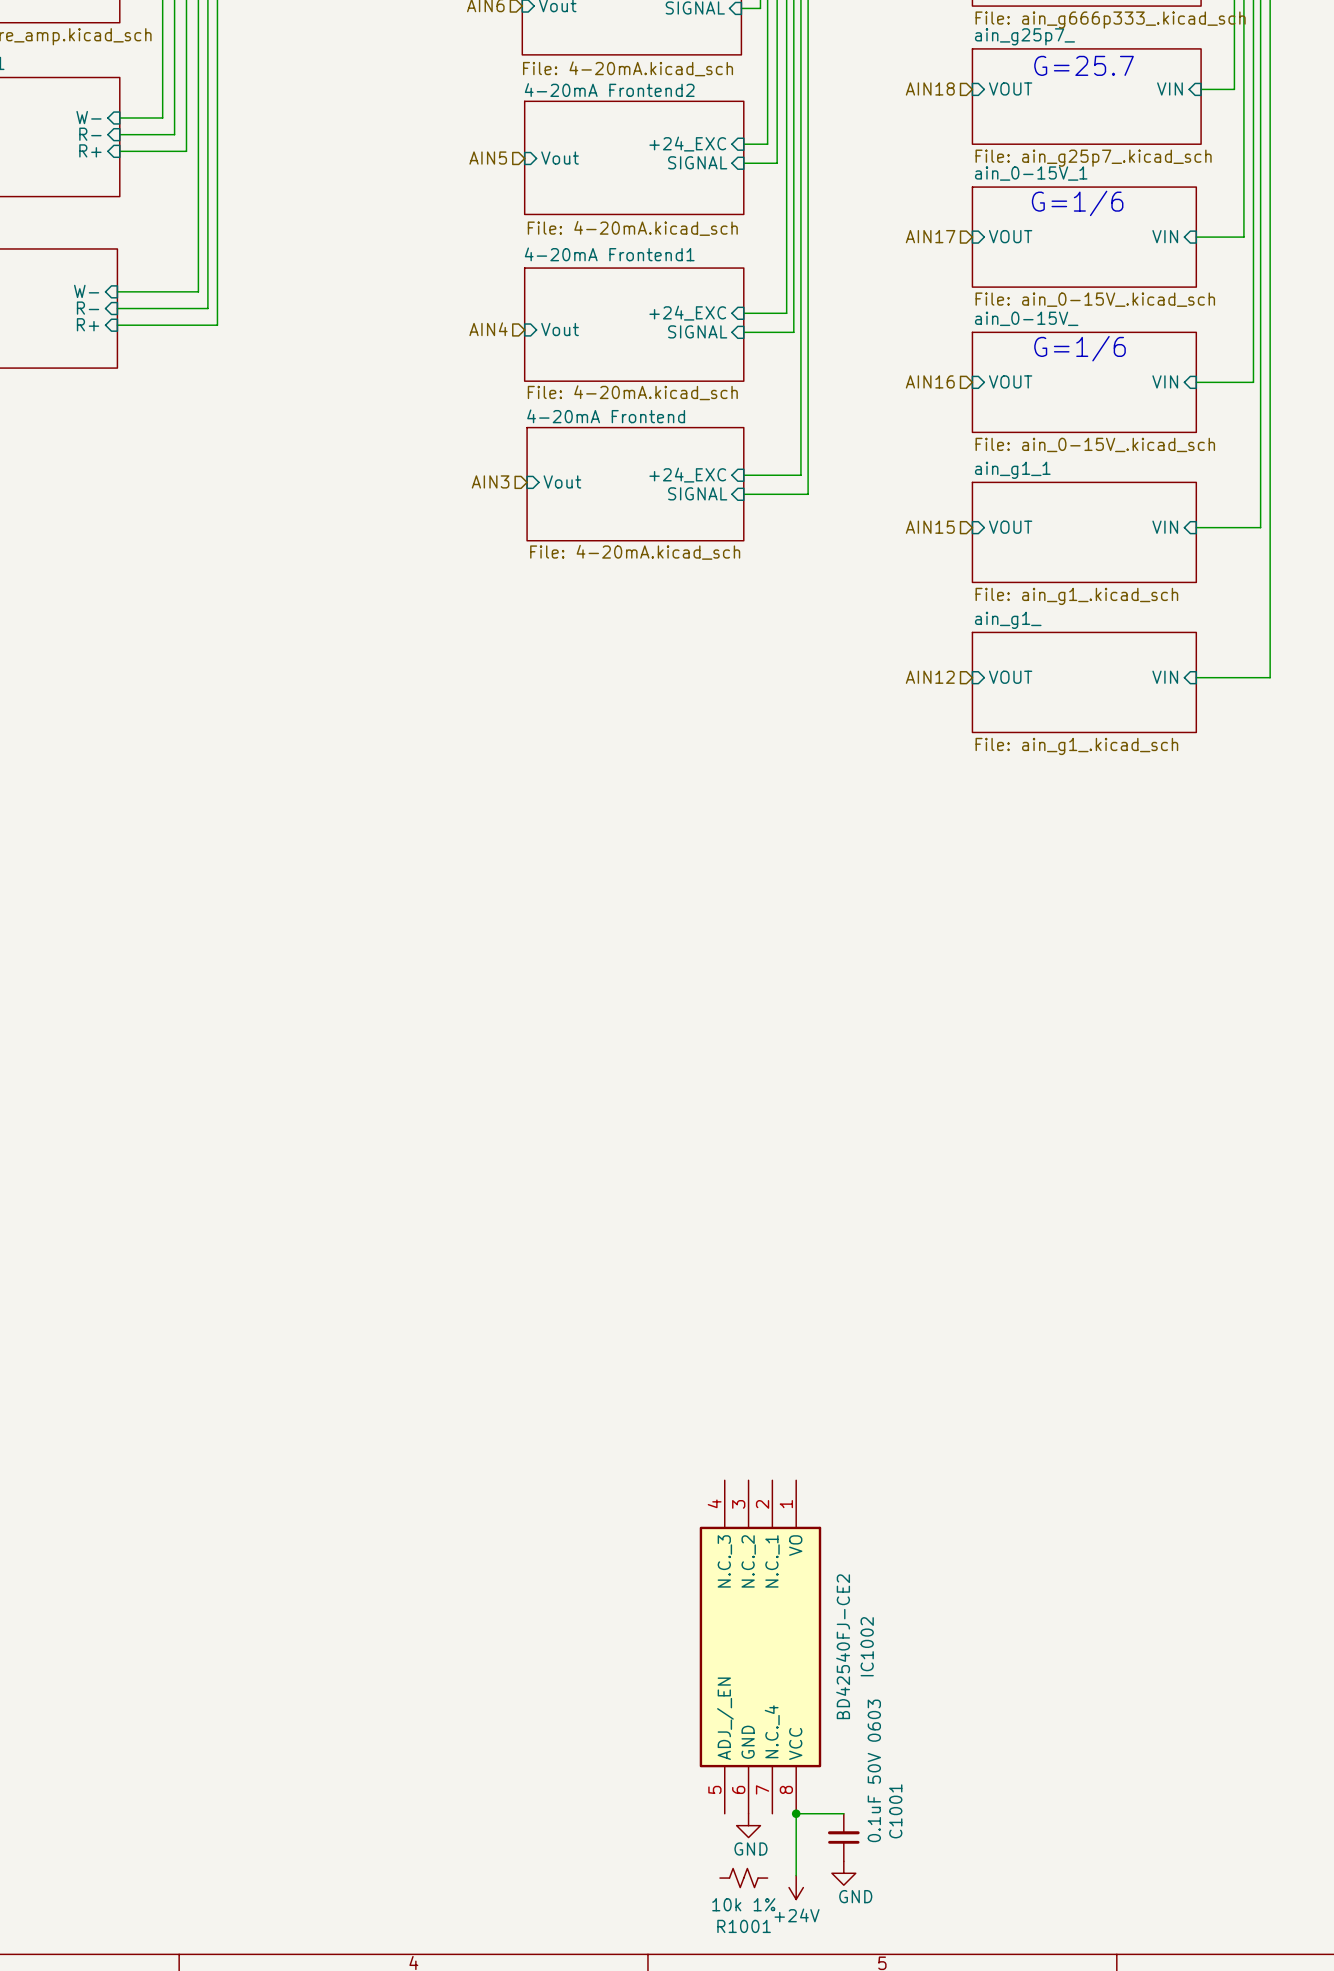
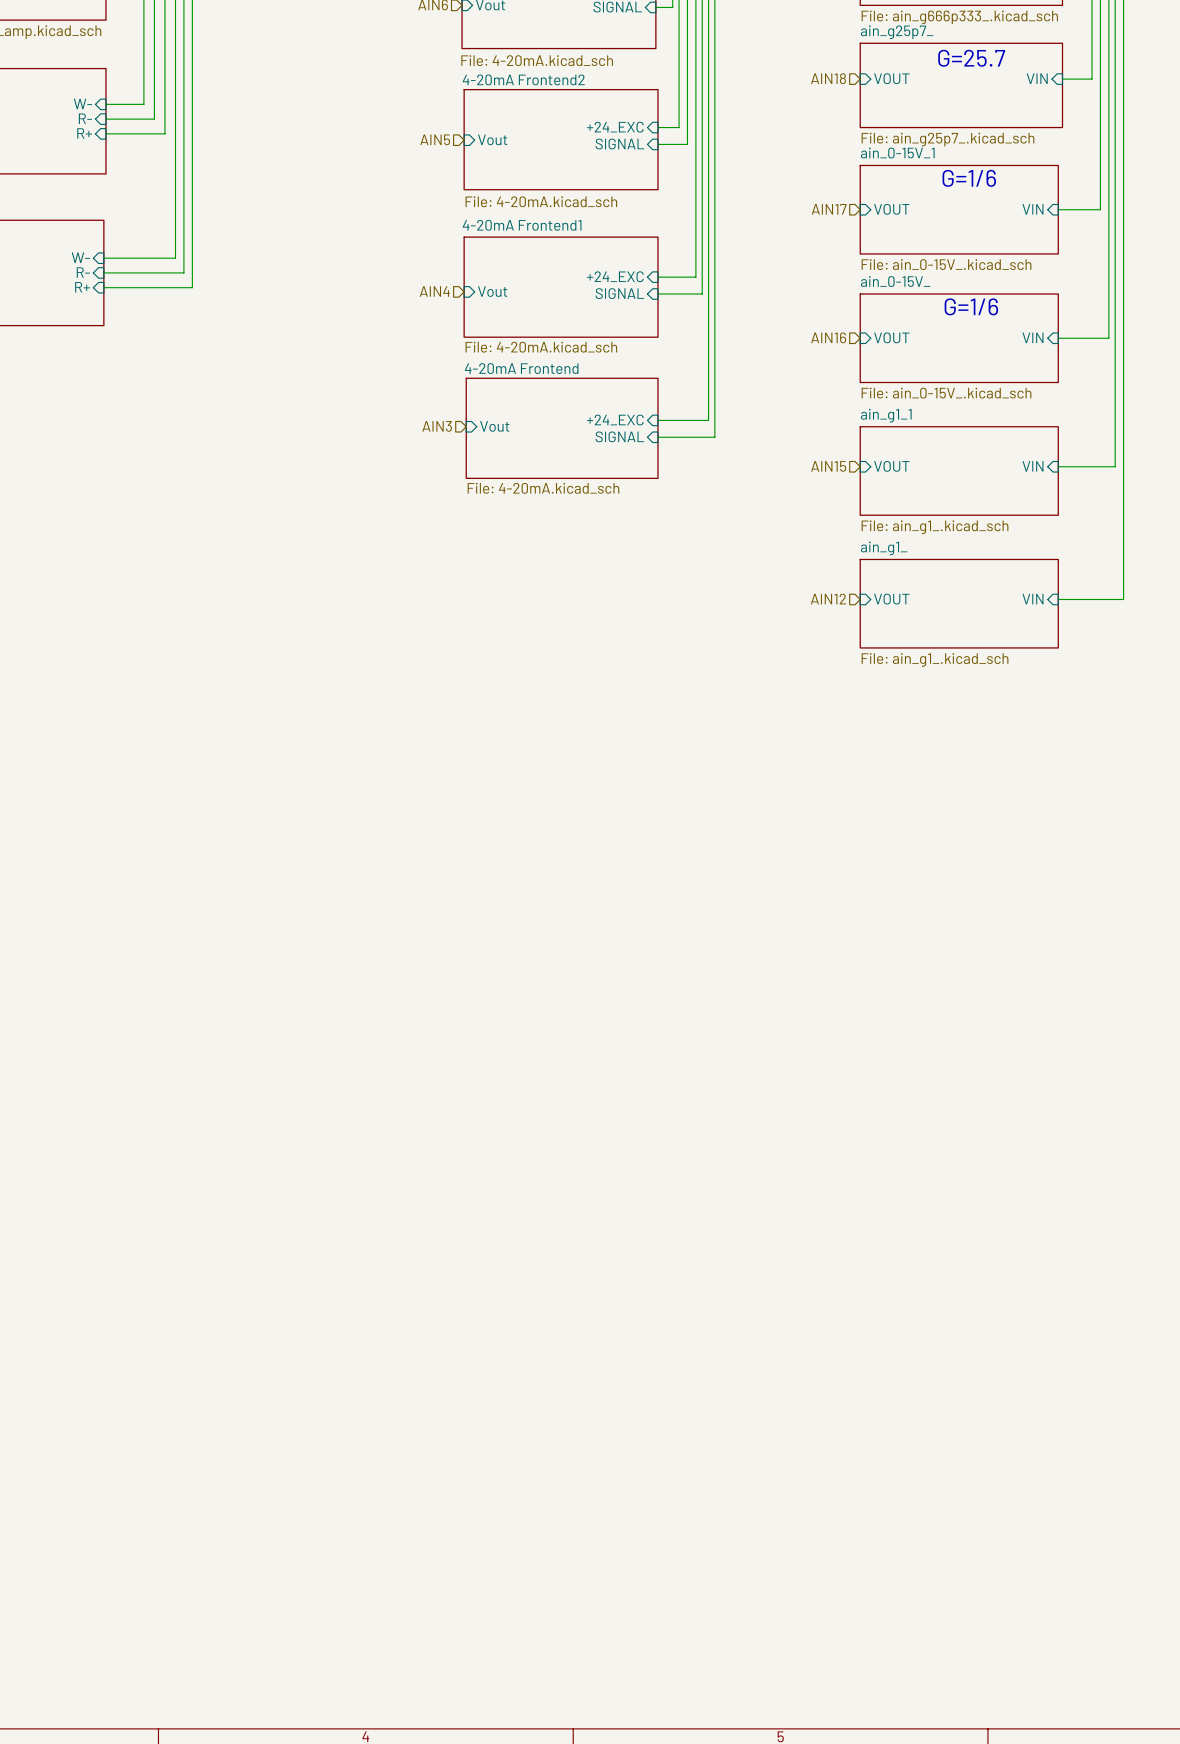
IC1002: BD42540FJ-CE2 (760, 1647) -> none
junction: (796, 1813) -> none
wire: (843, 1813) (796, 1813) (796, 1875) -> none
power symbol: GND (748, 1825) -> none
C1001: 0.1uF 50V 0603 (843, 1837) -> none
power symbol: GND (843, 1873) -> none
R1001: 10k 1% (743, 1878) -> none
power symbol: +24V (796, 1887) -> none

